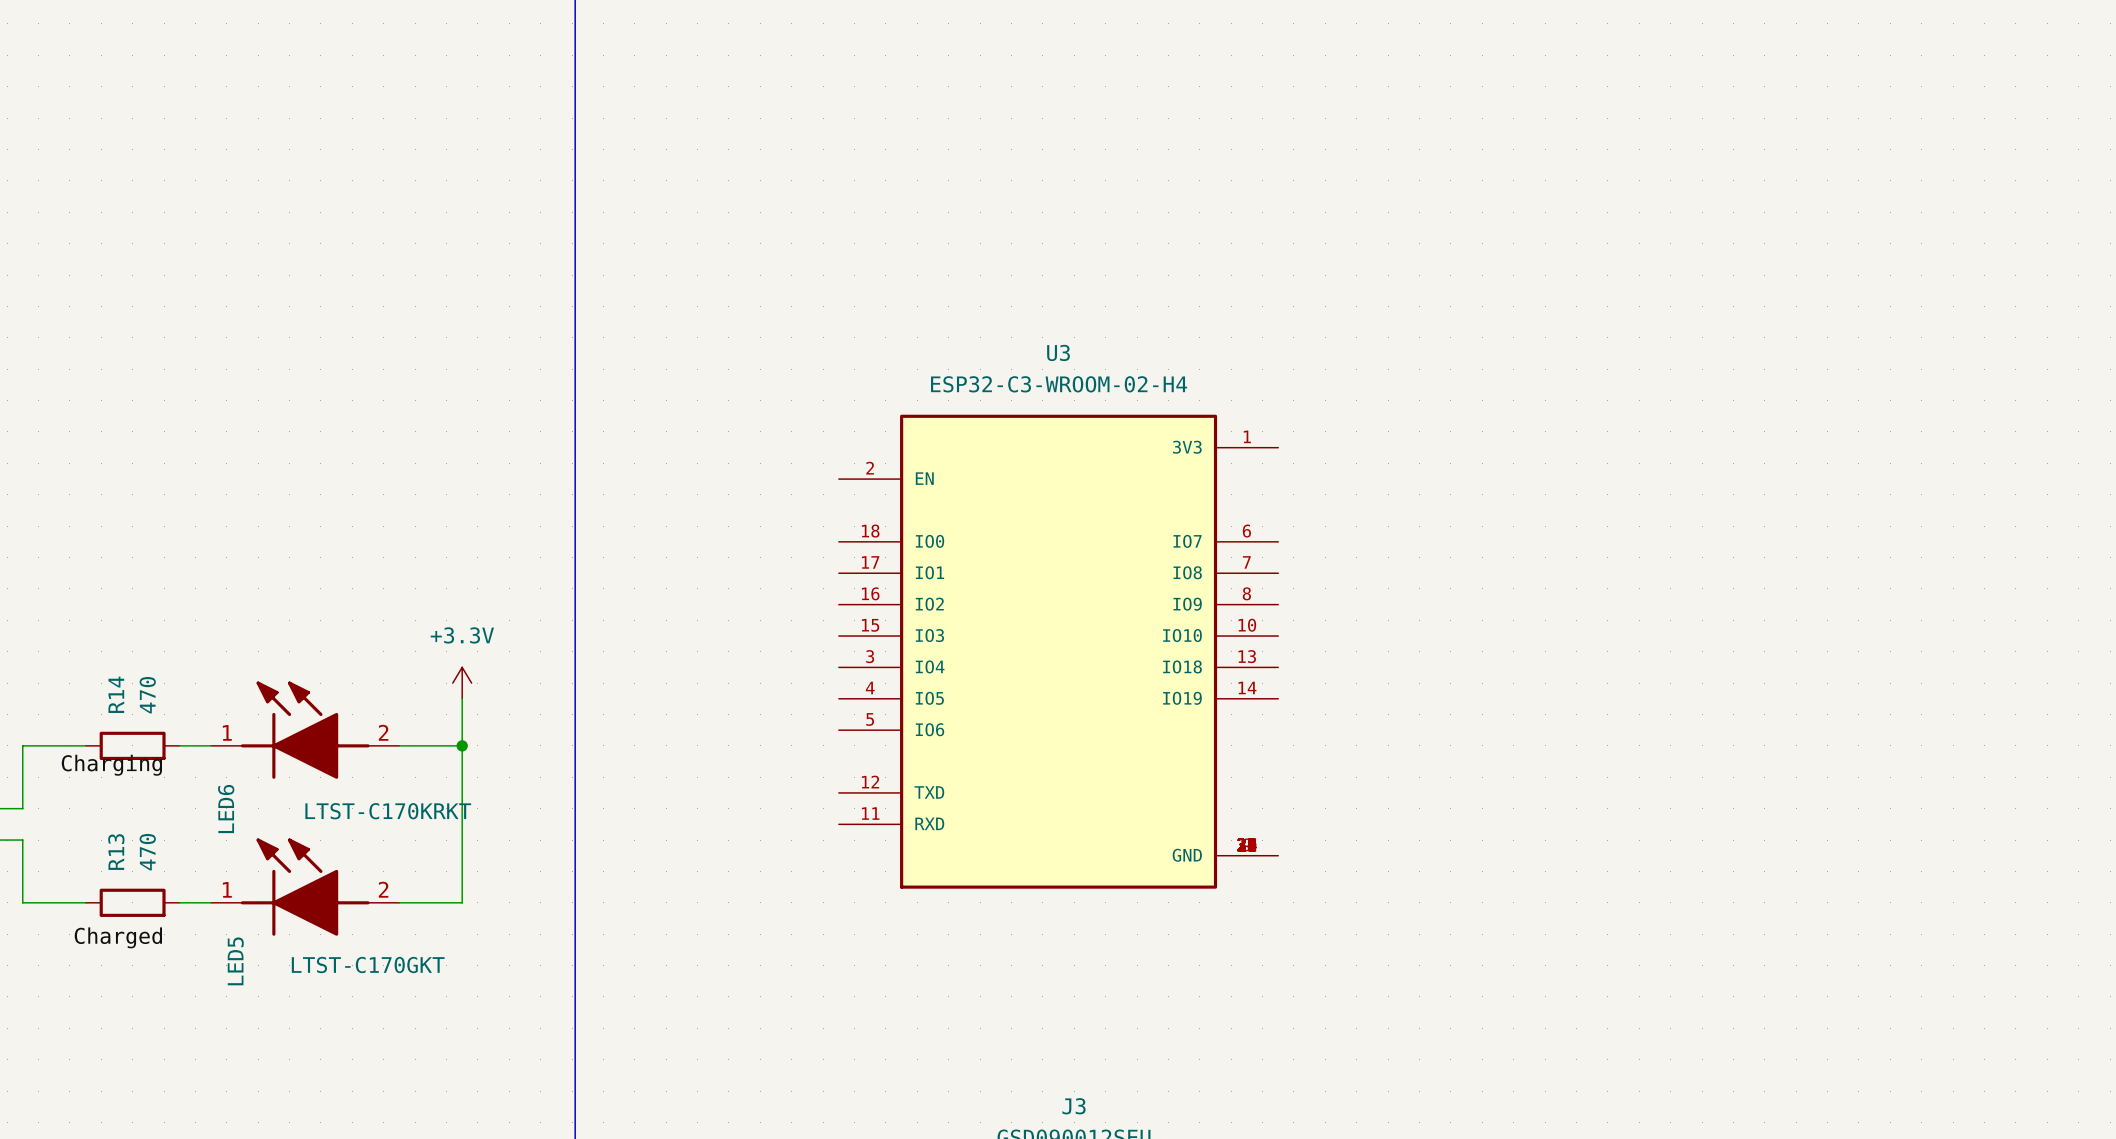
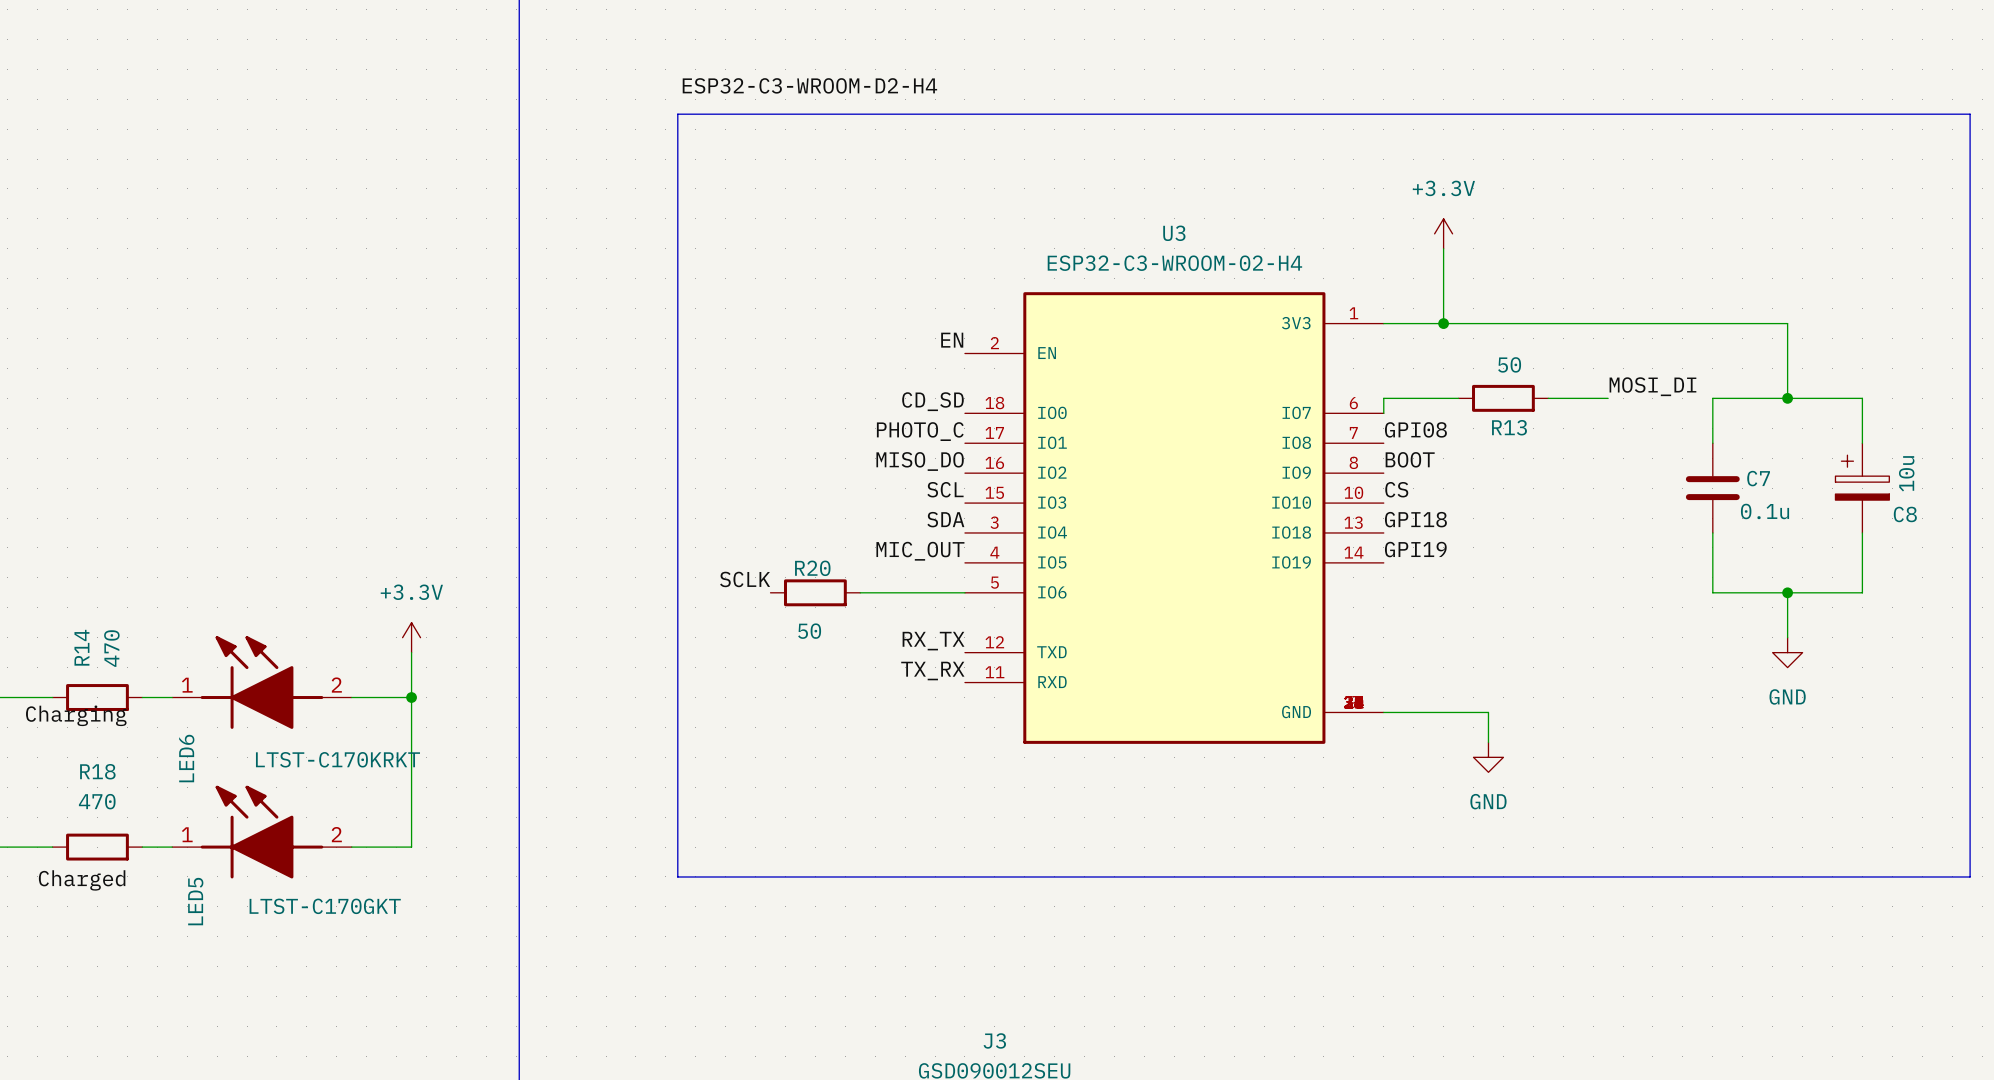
label: none -> ESP32-C3-WROOM-D2-H4 (809, 85)
line: none -> (677, 114) (1970, 114) (1970, 876) (677, 876) (677, 114)
power symbol: none -> +3.3V (1443, 233)
wire: none -> (1443, 248) (1443, 323)
wire: none -> (1383, 323) (1787, 323) (1787, 398)
junction: none -> (1443, 323)
label: none -> EN (952, 340)
label: none -> MOSI_DI (1652, 386)
wire: none -> (1458, 398) (1383, 398) (1383, 413)
R13: none -> 50 (1503, 398)
wire: none -> (1548, 398) (1608, 398)
junction: none -> (1787, 398)
label: none -> CD_SD (932, 401)
label: none -> GPI08 (1415, 429)
label: none -> PHOTO_C (920, 431)
wire: none -> (1712, 443) (1712, 398) (1862, 398) (1862, 443)
label: none -> BOOT (1410, 459)
label: none -> MISO_DO (920, 461)
C7: none -> 0.1u (1712, 488)
C8: none -> 10u (1862, 488)
label: none -> SCL (945, 489)
label: none -> CS (1396, 489)
label: none -> SDA (945, 519)
label: none -> GPI18 (1415, 519)
wire: none -> (1712, 532) (1712, 592) (1862, 592) (1862, 532)
label: none -> GPI19 (1415, 549)
label: none -> MIC_OUT (920, 551)
label: none -> SCLK (745, 579)
R20: none -> 50 (815, 592)
wire: none -> (1787, 592) (1787, 637)
junction: none -> (1787, 592)
U3 position: (1058, 651) -> (1174, 518)
label: none -> RX_TX (933, 641)
power symbol: none -> GND (1787, 652)
label: none -> TX_RX (932, 671)
wire: none -> (1383, 712) (1488, 712) (1488, 742)
power symbol: none -> GND (1488, 757)
R13 name: R13 (116, 852) -> R18 (97, 771)
R13 value rotation: 0° (147, 852) -> 90° clockwise (97, 801)

